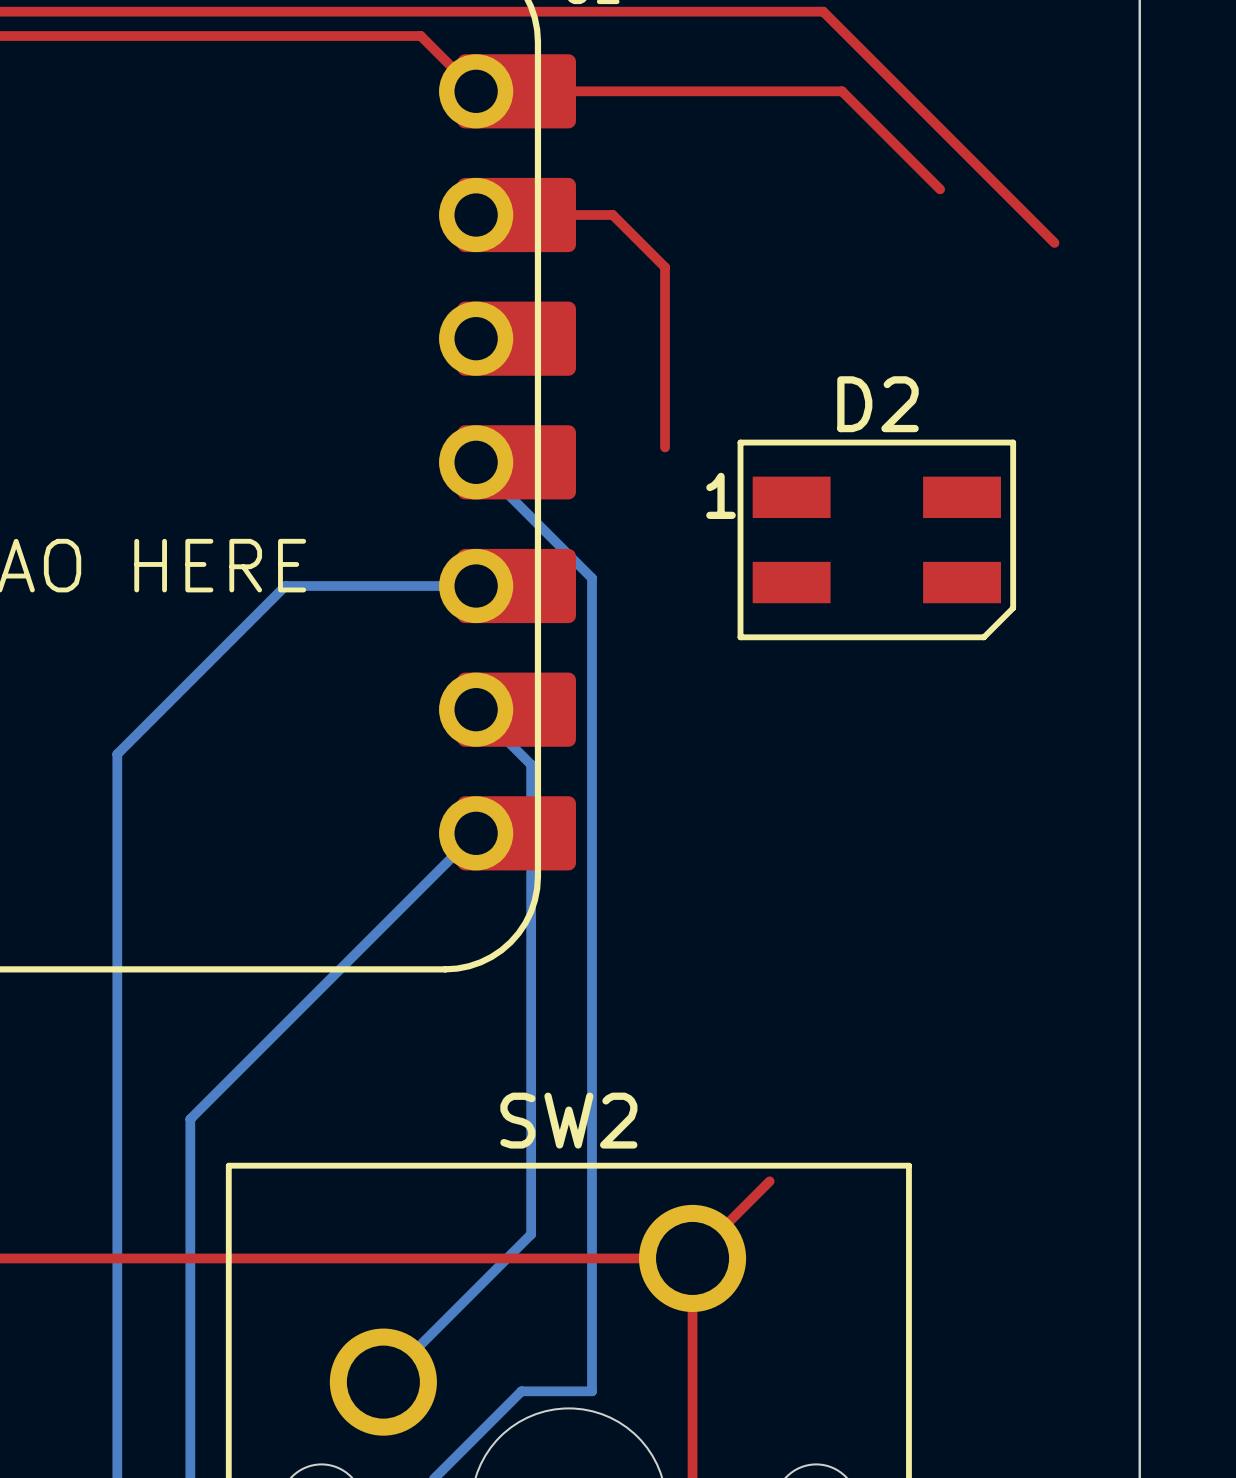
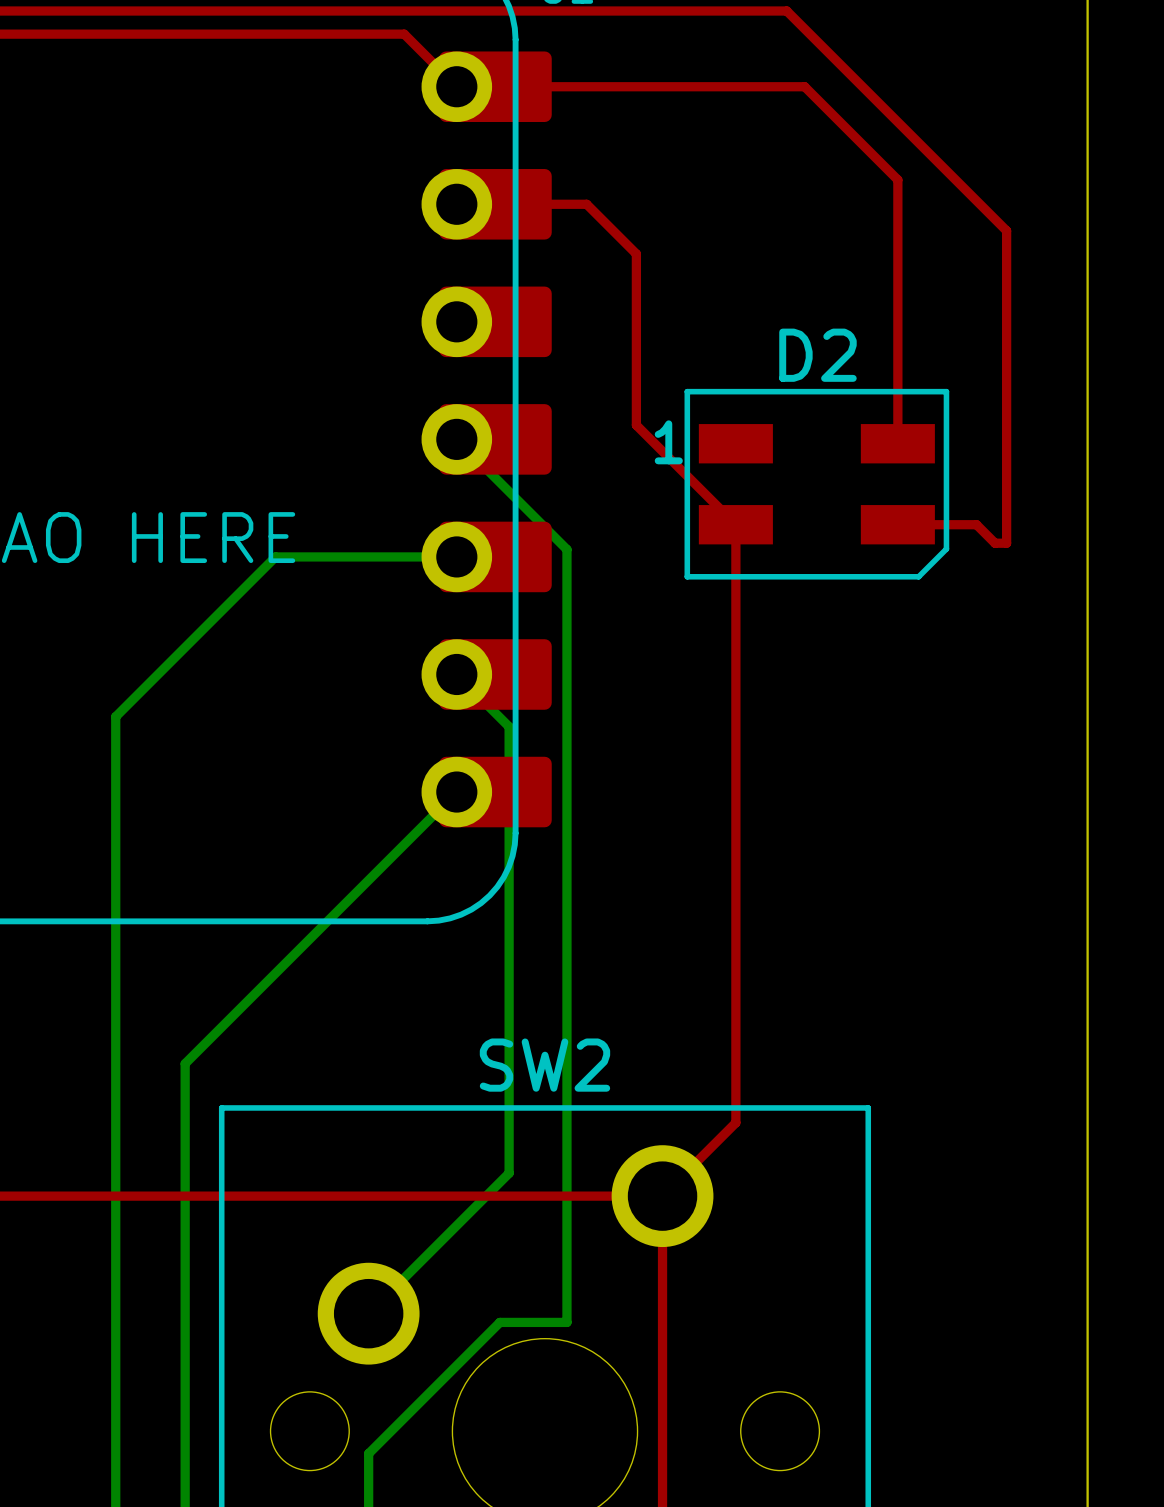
top track: none -> (897, 179) (897, 443)
top track: none -> (1006, 230) (1006, 543) (995, 543) (976, 524) (897, 524)
top track: none -> (636, 425) (735, 524) (735, 1122)
D2 position: (876, 539) -> (816, 484)

